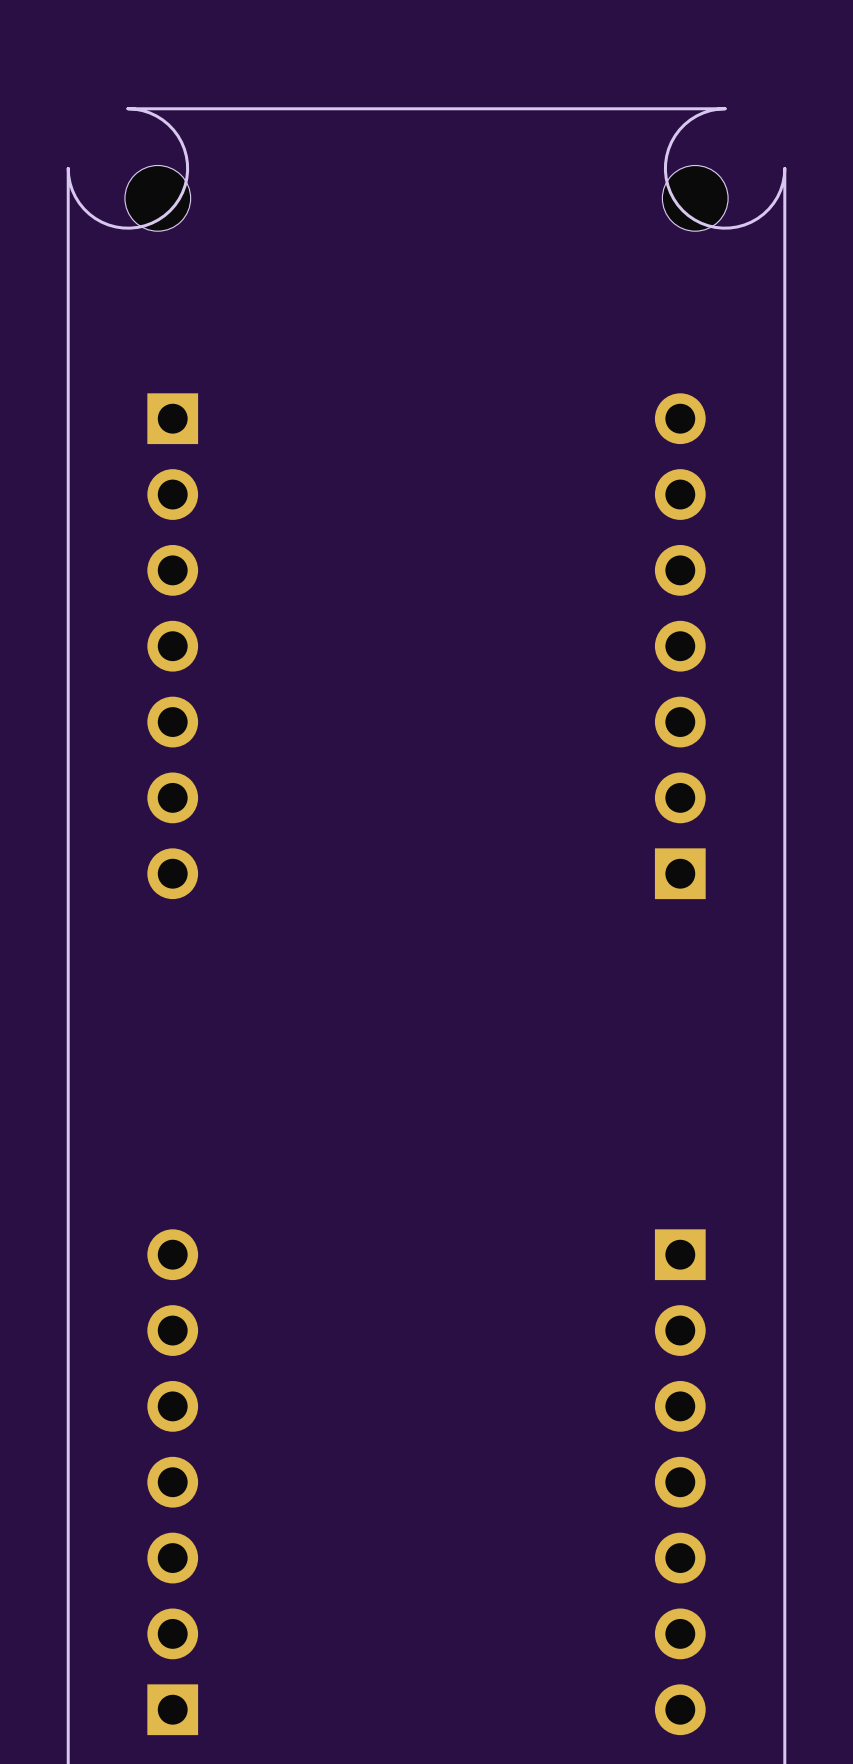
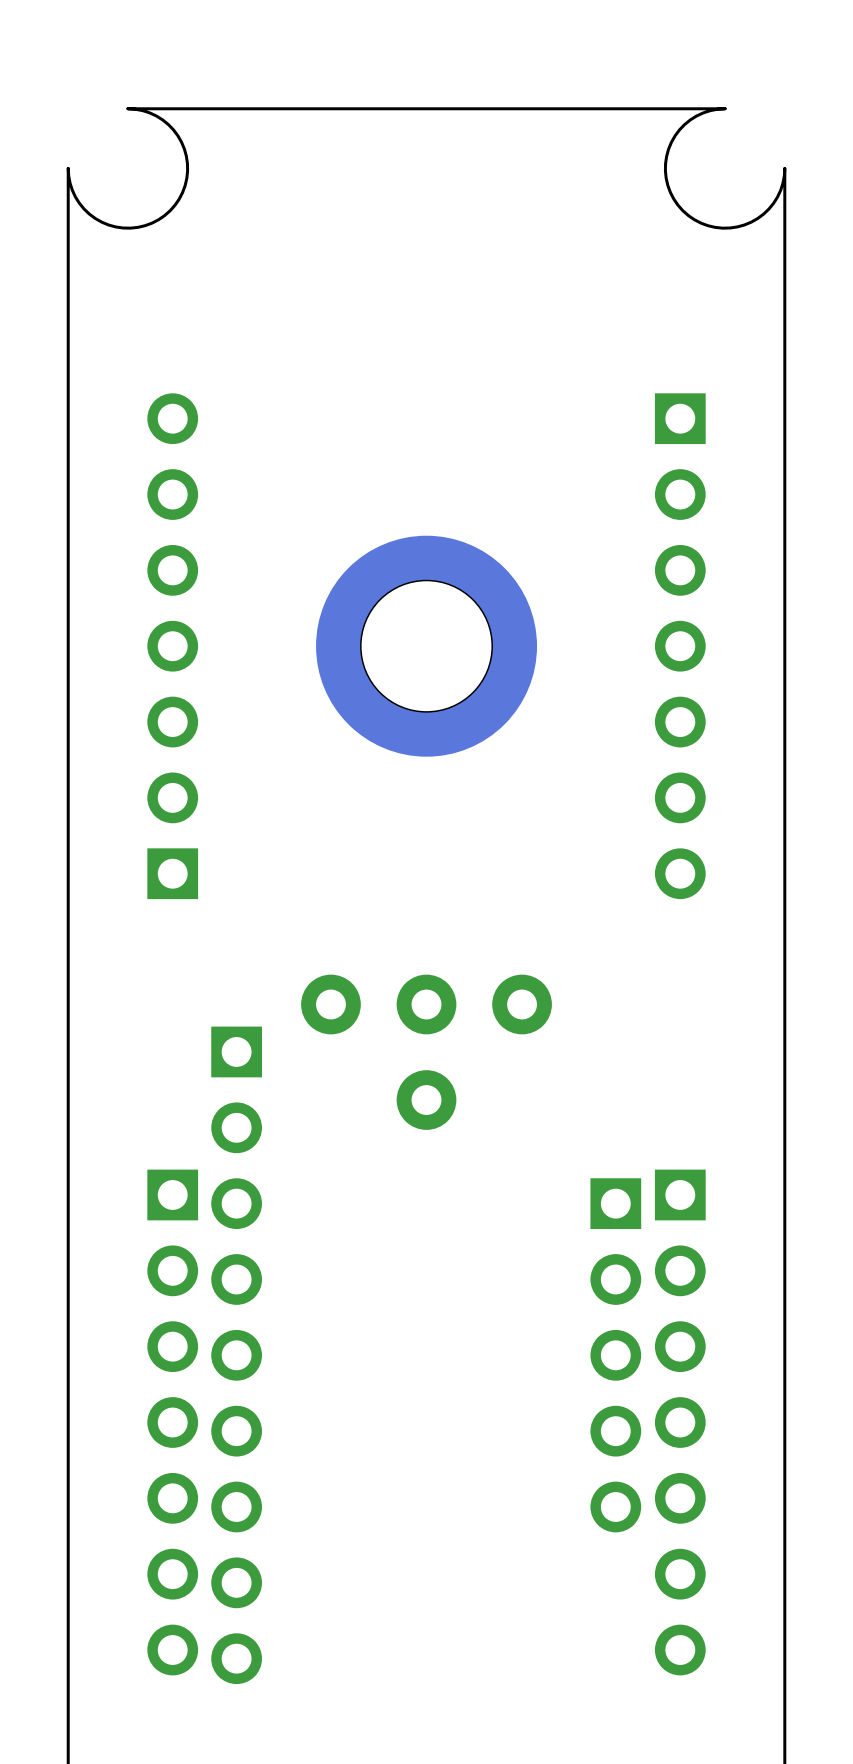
part: (157, 198) -> none
part: (695, 198) -> none
part rotation: 0° (172, 646) -> 180° (172, 646)
part: none -> (426, 646)
part rotation: 0° (680, 646) -> 180° (680, 646)
part: none -> (330, 1004)
part: none -> (426, 1004)
part: none -> (522, 1004)
part: none -> (426, 1100)
part: none -> (236, 1355)
part: none -> (615, 1355)
part rotation: 0° (172, 1482) -> 180° (172, 1422)
part position: (680, 1482) -> (680, 1422)

